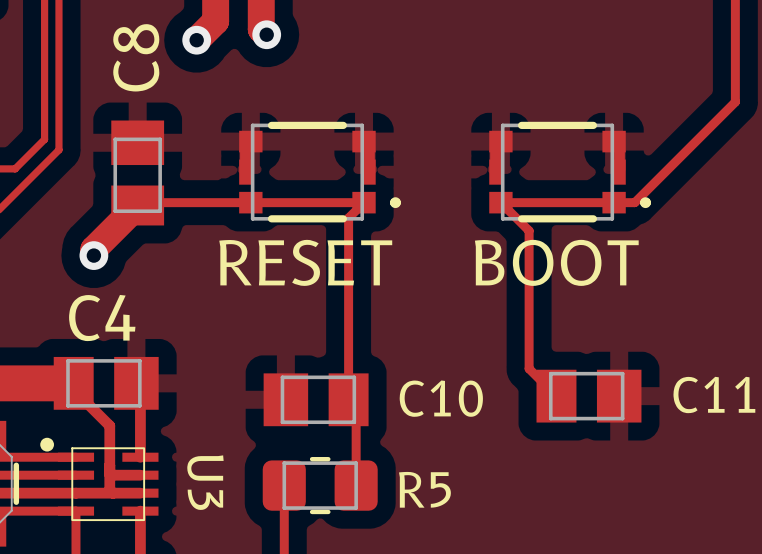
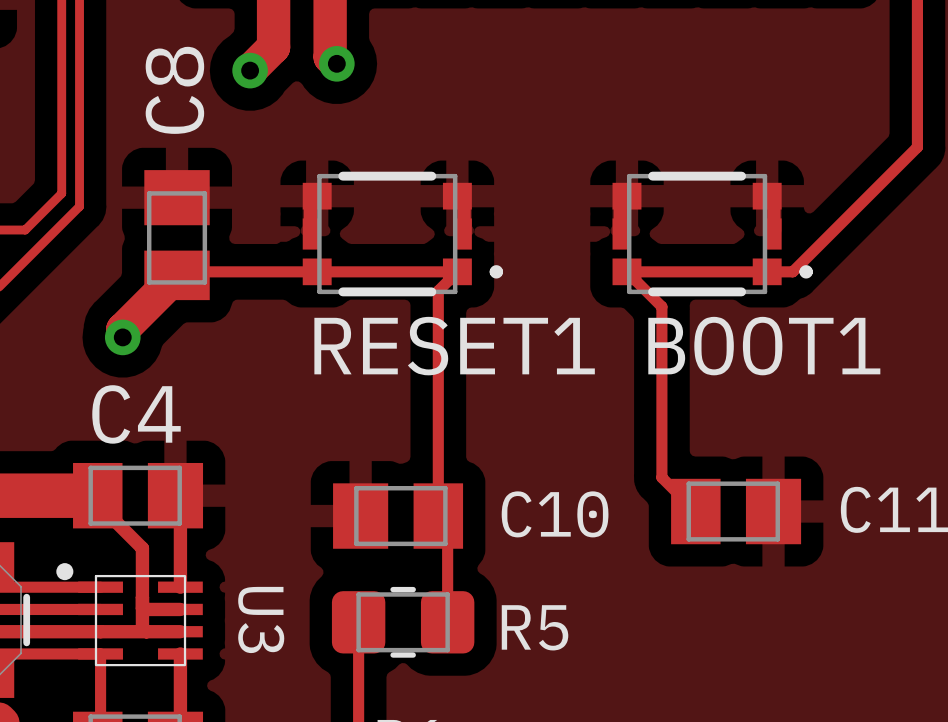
RESET name: RESET (305, 262) -> RESET1 (454, 346)
BOOT name: BOOT (556, 262) -> BOOT1 (764, 346)

